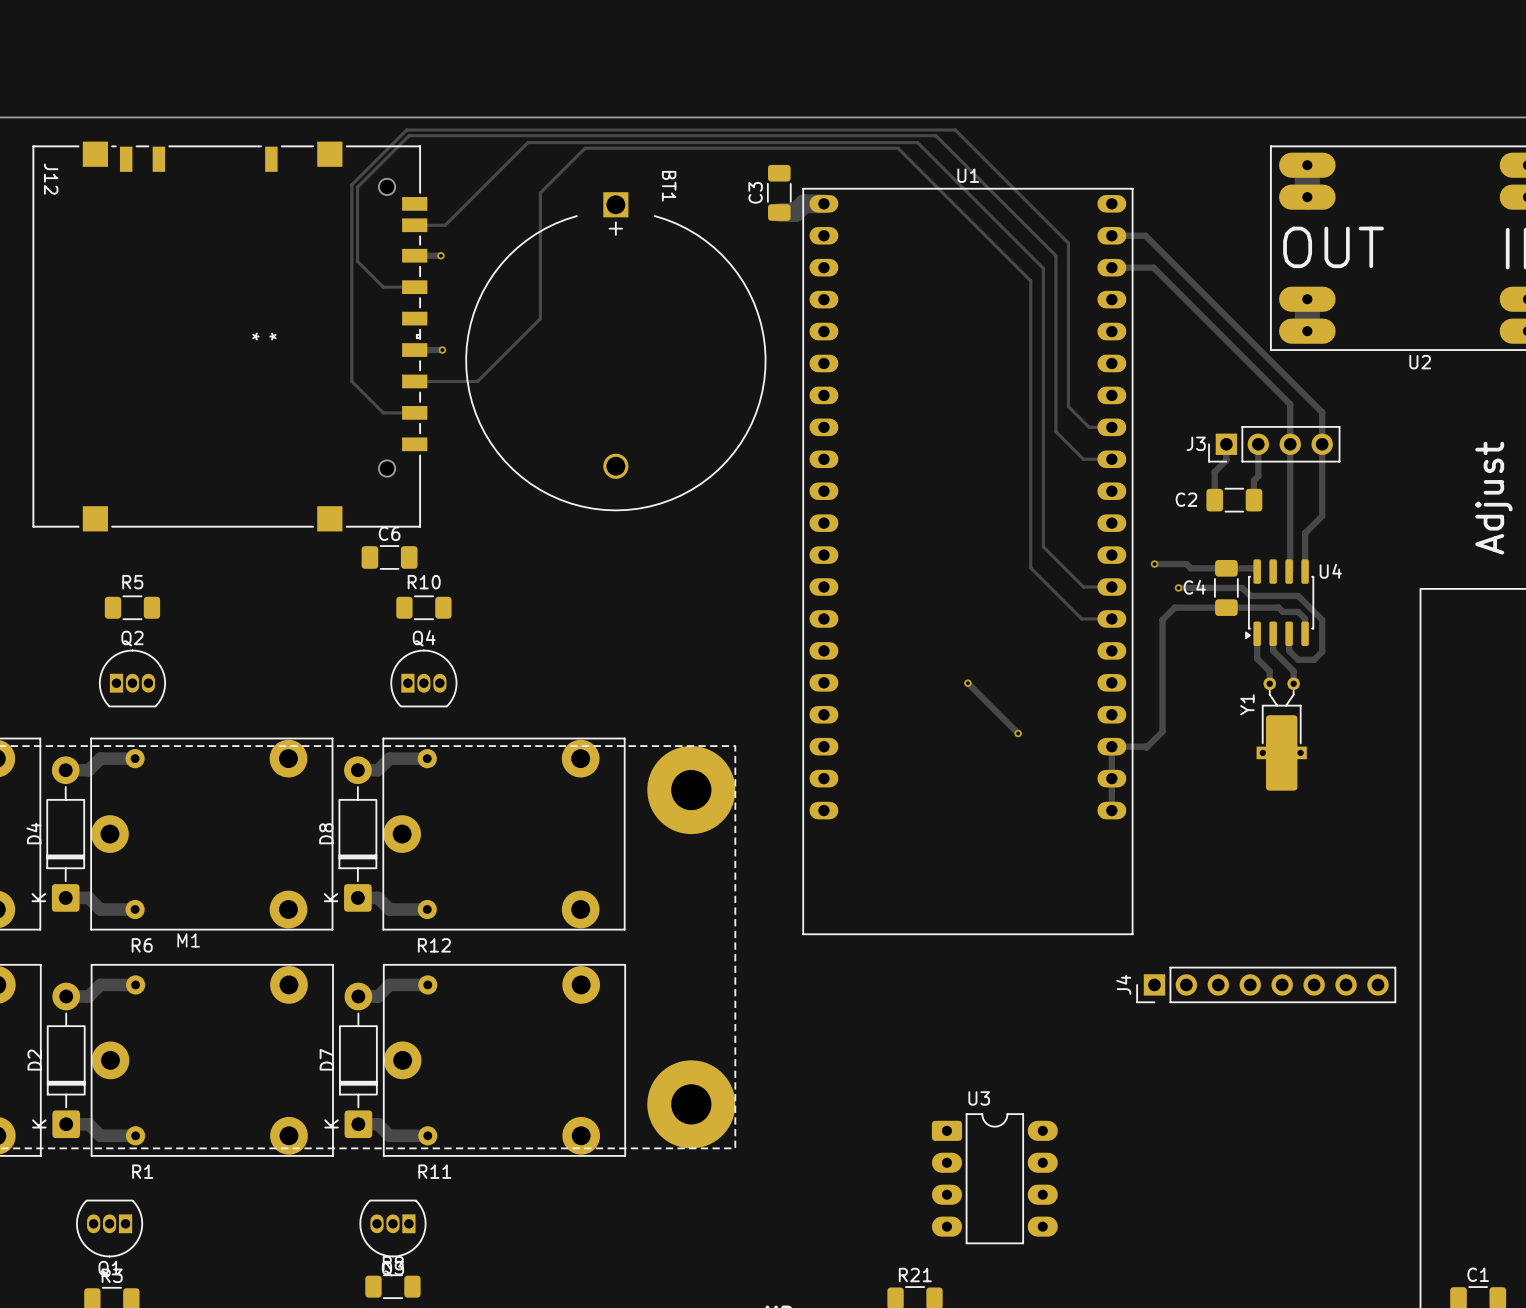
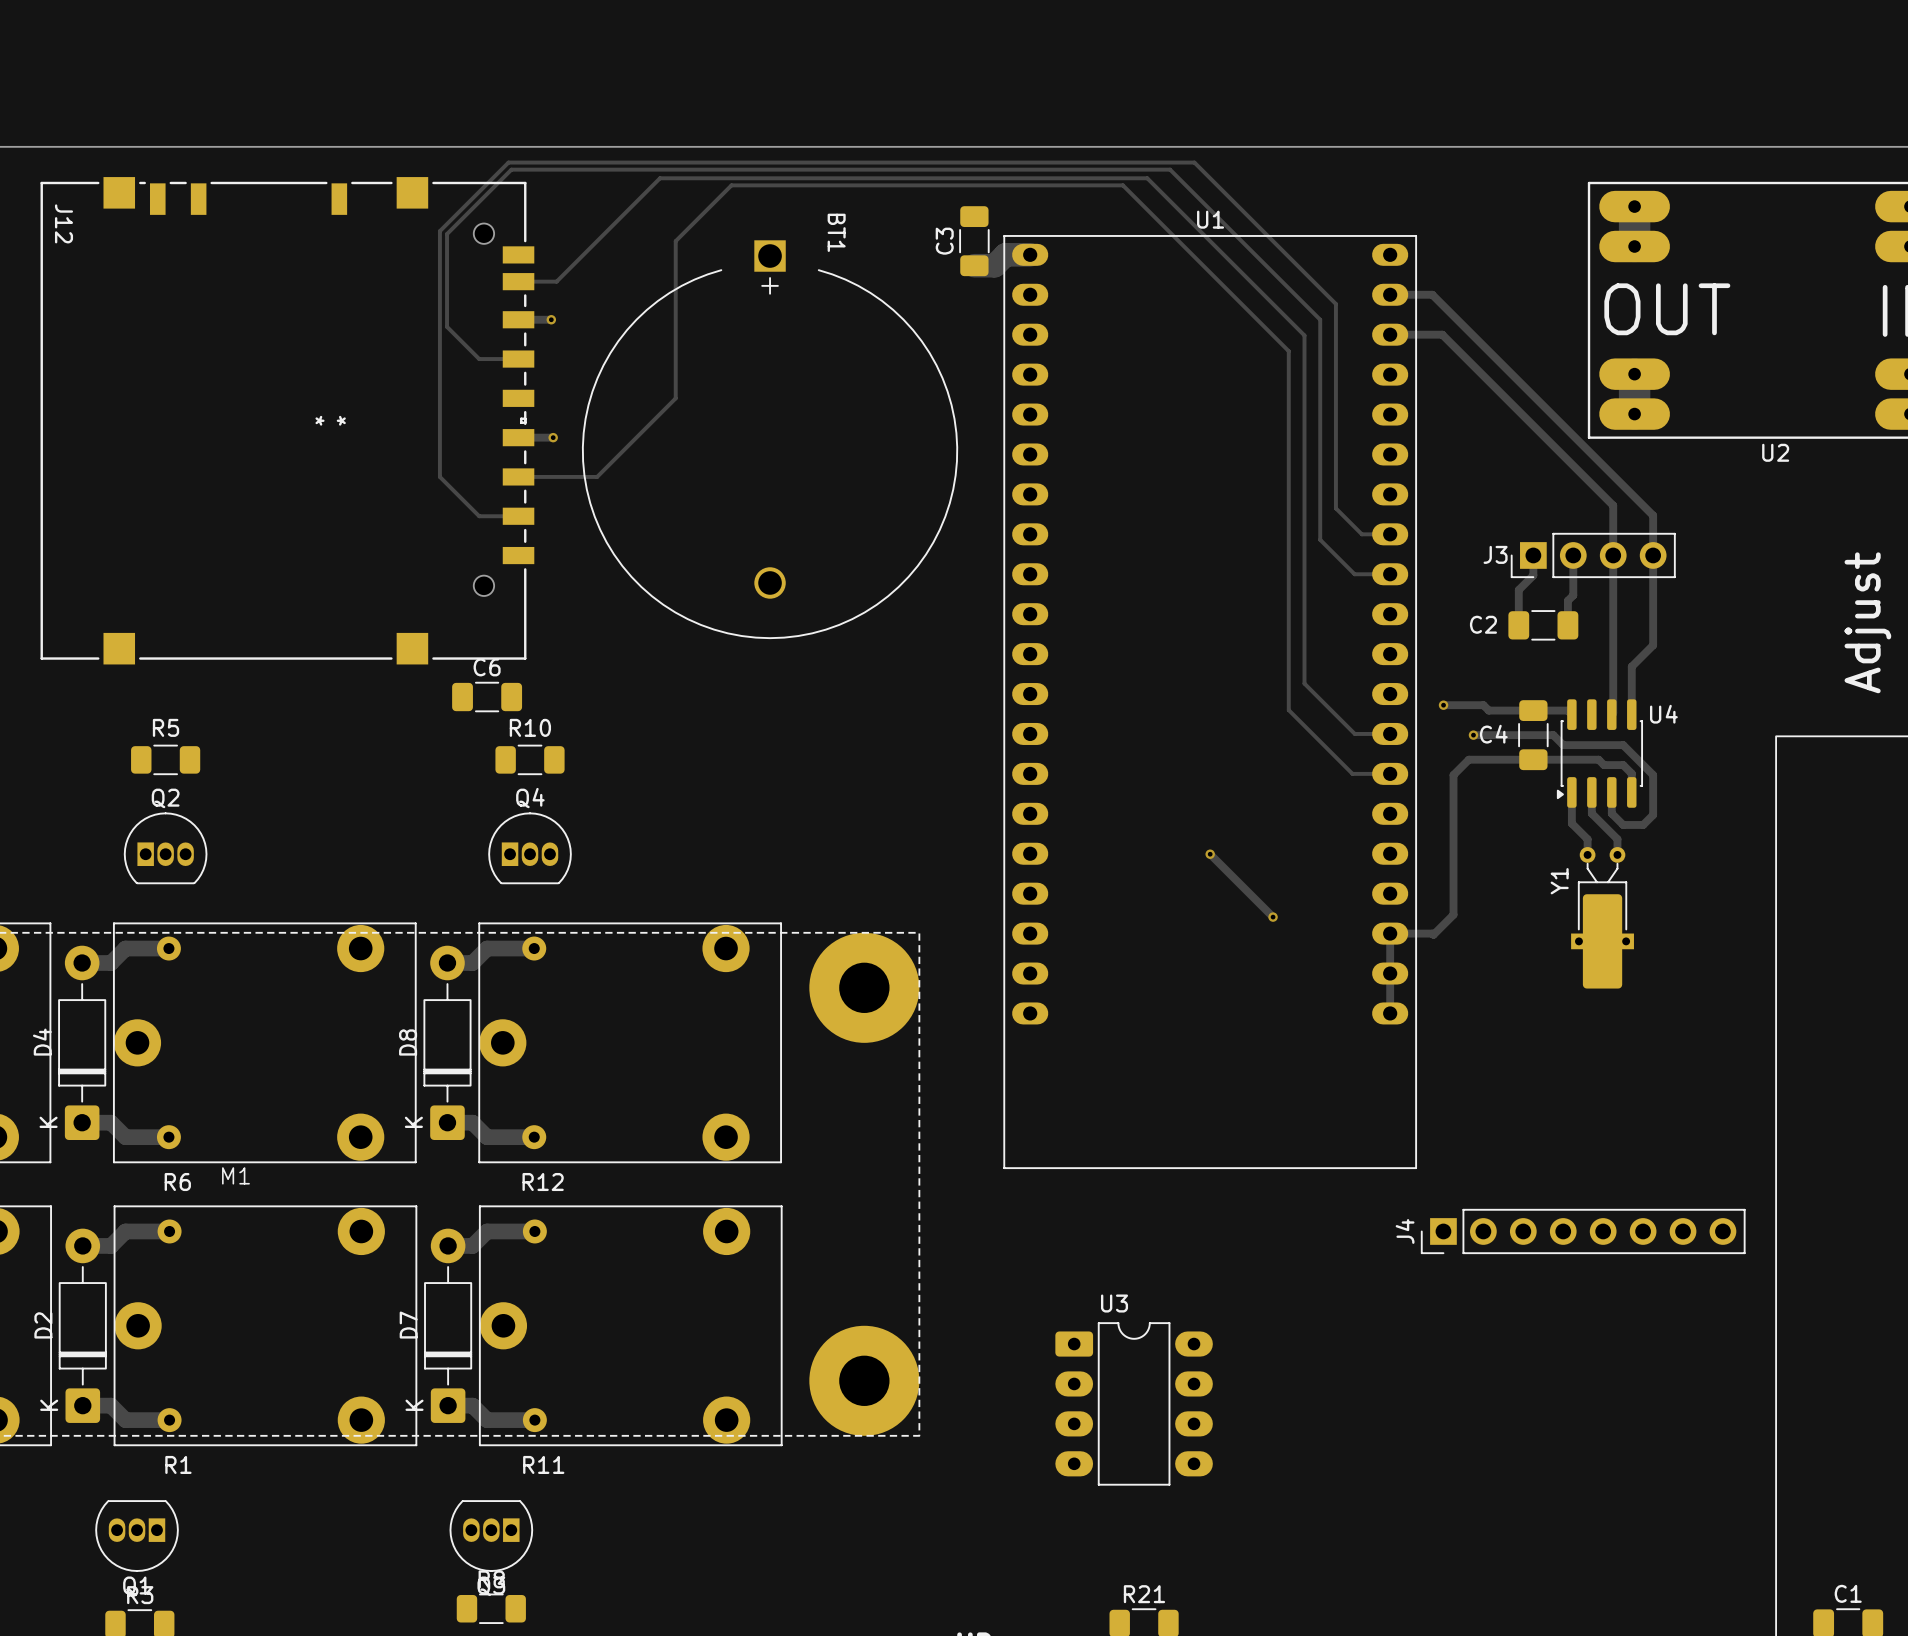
U3 position: (994, 1178) -> (1134, 1403)

